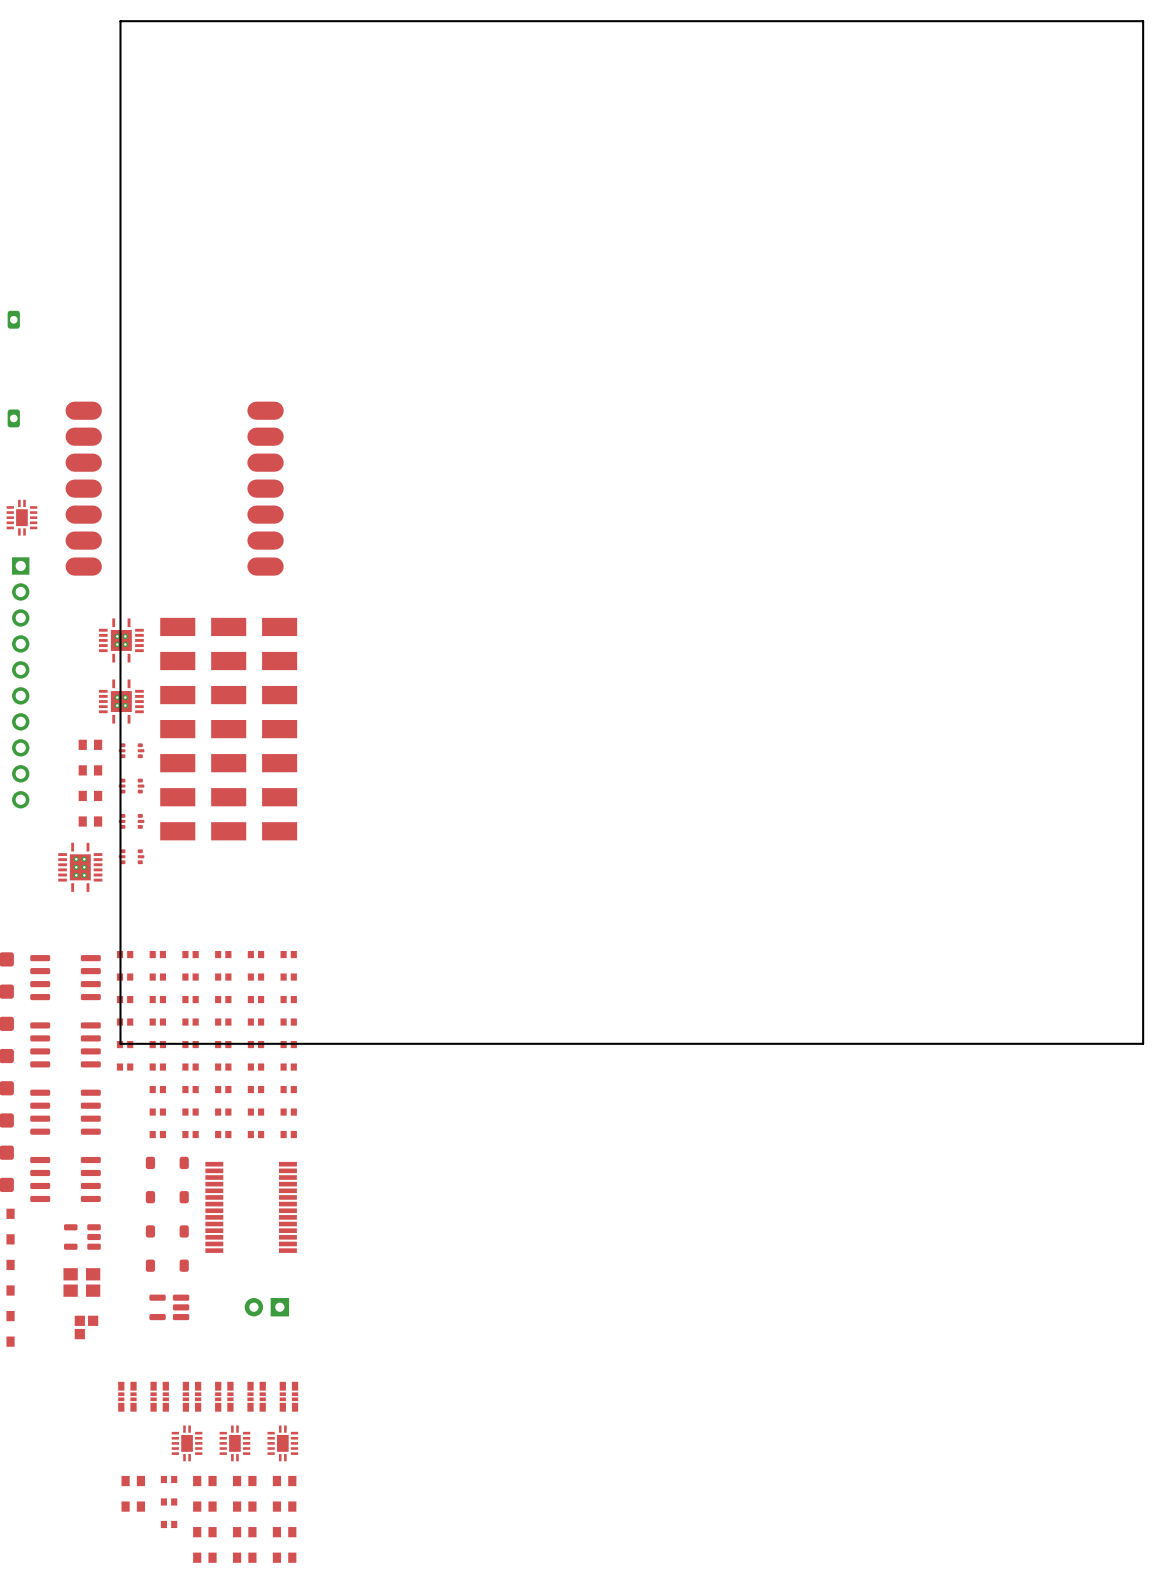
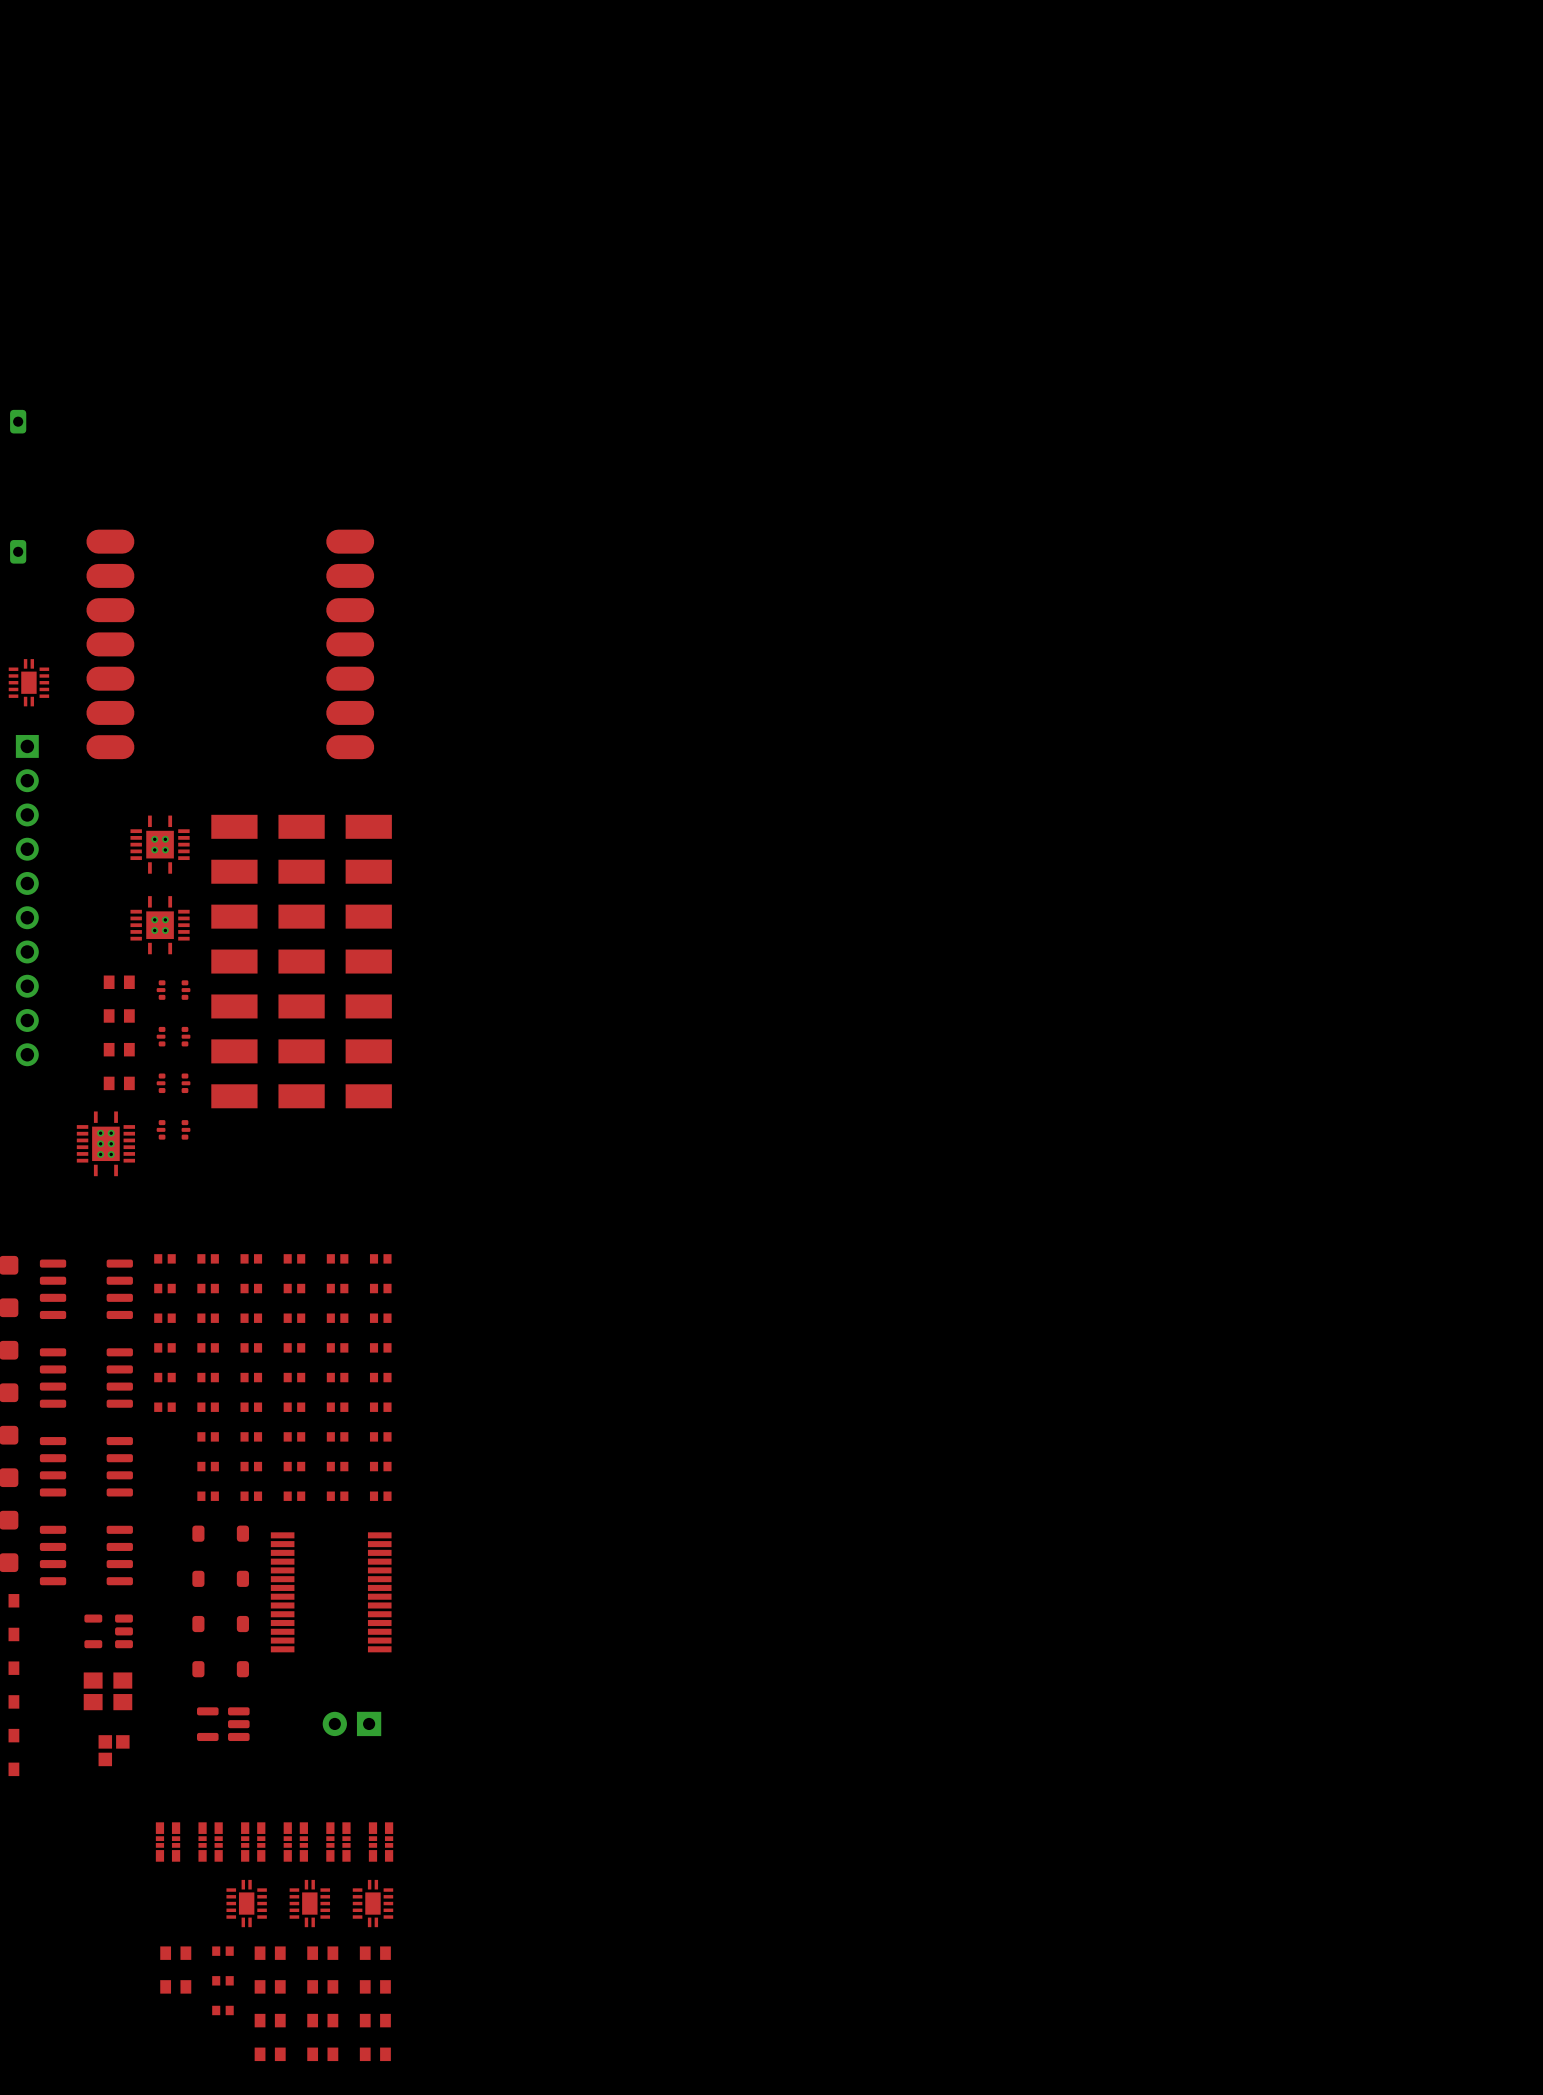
board edge: (1143, 21) (120, 21) (120, 1043) (1143, 1043) (1143, 21) -> none

